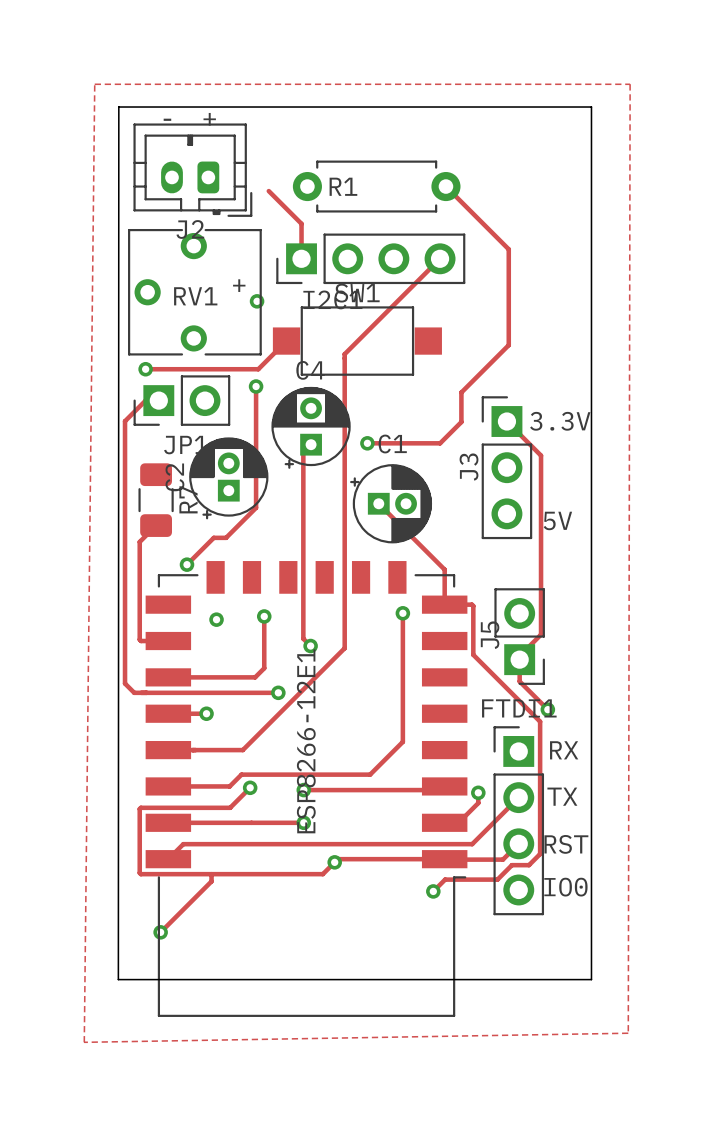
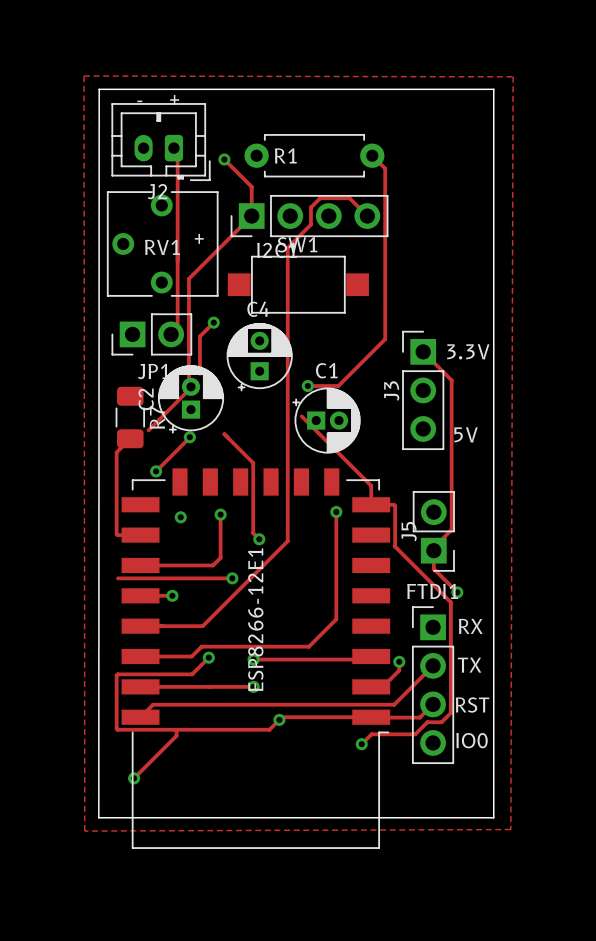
zone outline: (94, 84) (84, 1042) (628, 1033) (630, 84) (94, 84) -> (84, 76) (84, 831) (510, 829) (513, 76) (84, 76)
track: none -> (177, 151) (177, 327)
via: none -> (224, 159)
track: (461, 201) (508, 249) (508, 345) (461, 392) -> (385, 168) (385, 327)
track: none -> (251, 216) (188, 278) (188, 389) (148, 430)
track: (440, 258) (344, 354) -> (367, 216) (349, 198) (320, 198) (310, 207) (310, 224) (287, 247) (287, 295)
via: (257, 301) -> none
track: (286, 341) (258, 369) (145, 369) -> none
via: (145, 369) -> none
track: (256, 386) (256, 507) (226, 537) (213, 537) -> (213, 322) (199, 336) (199, 373)
track: (158, 400) (145, 400) (125, 421) (125, 683) (134, 692) (141, 692) -> none
track: (461, 406) (461, 422) (440, 443) (367, 443) -> (385, 339) (338, 386) (307, 386)
via position: (367, 443) -> (307, 386)
track: (311, 444) (303, 452) (303, 554) -> (224, 434) (253, 463)
track: (378, 503) (444, 569) (444, 581) -> (301, 416) (371, 485)
track: none -> (189, 437) (178, 449)
via: none -> (189, 437)

